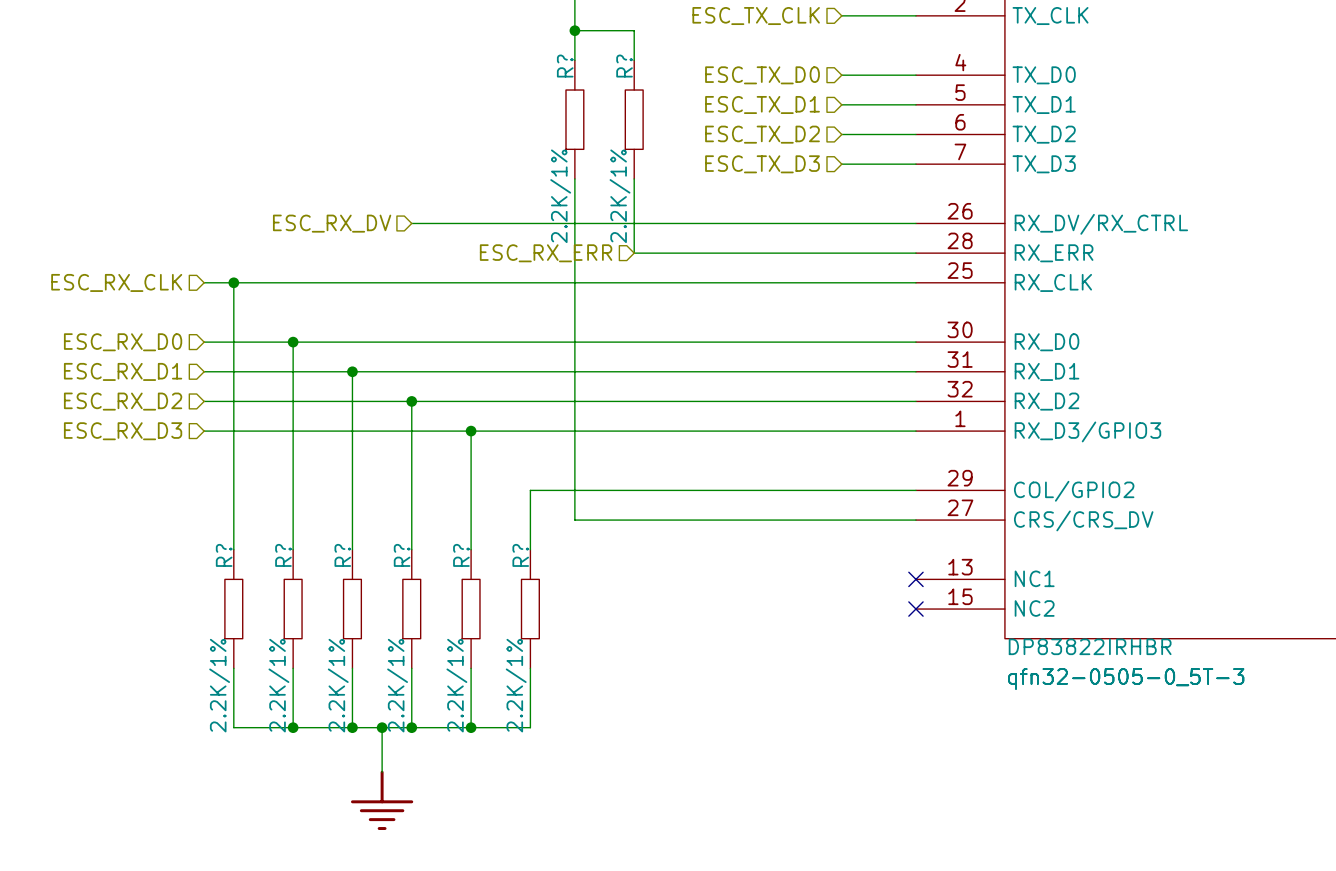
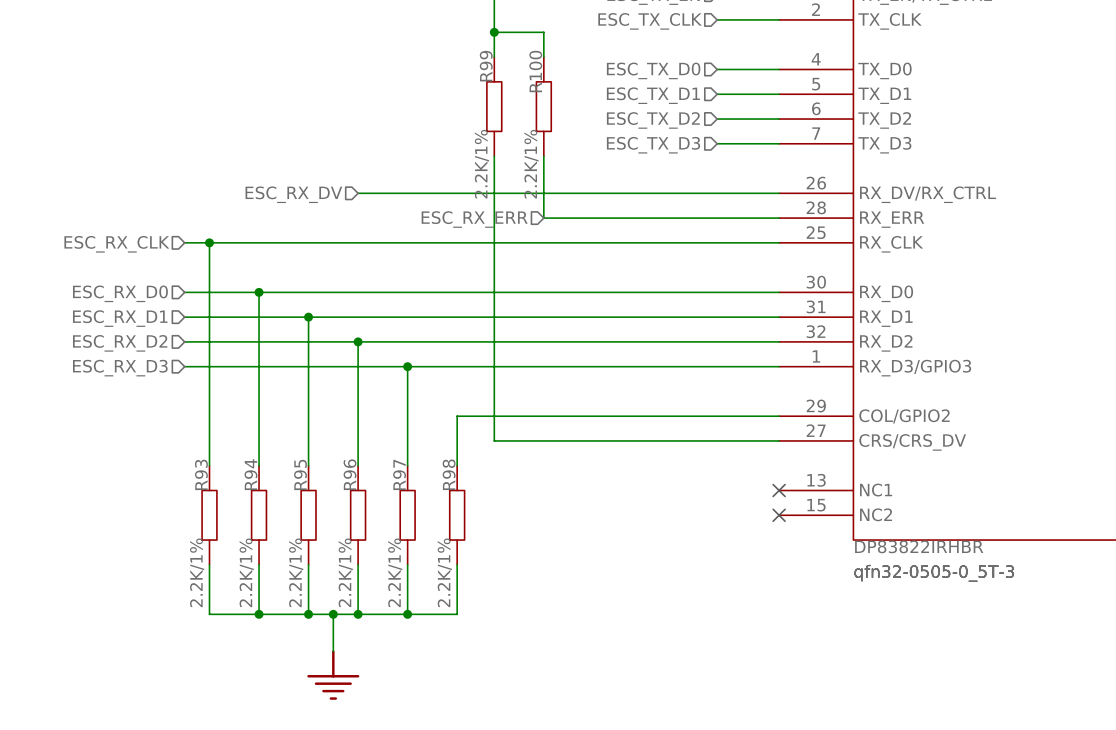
R? name: R? (565, 66) -> R99 (486, 66)
R? name: R? (624, 66) -> R100 (535, 71)
R? name: R? (224, 555) -> R93 (201, 474)
R? name: R? (283, 555) -> R94 (250, 474)
R? name: R? (342, 555) -> R95 (300, 474)
R? name: R? (402, 555) -> R96 (350, 474)
R? name: R? (461, 555) -> R97 (399, 474)
R? name: R? (520, 555) -> R98 (449, 474)

